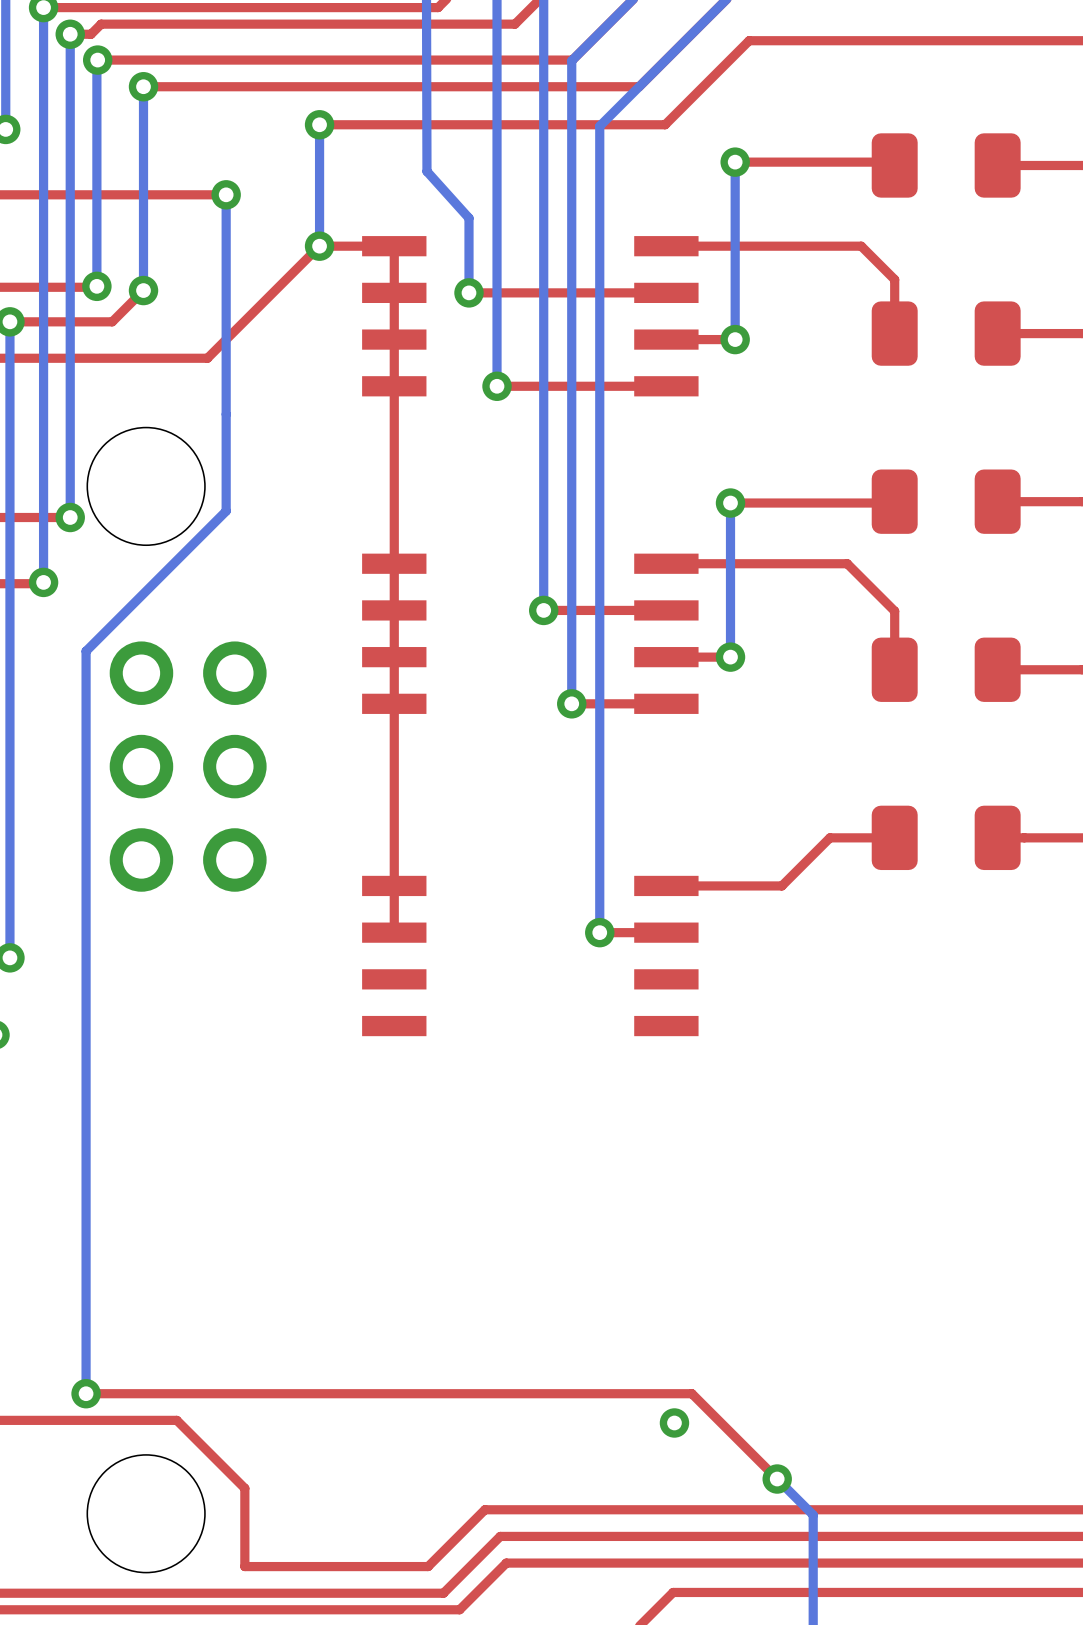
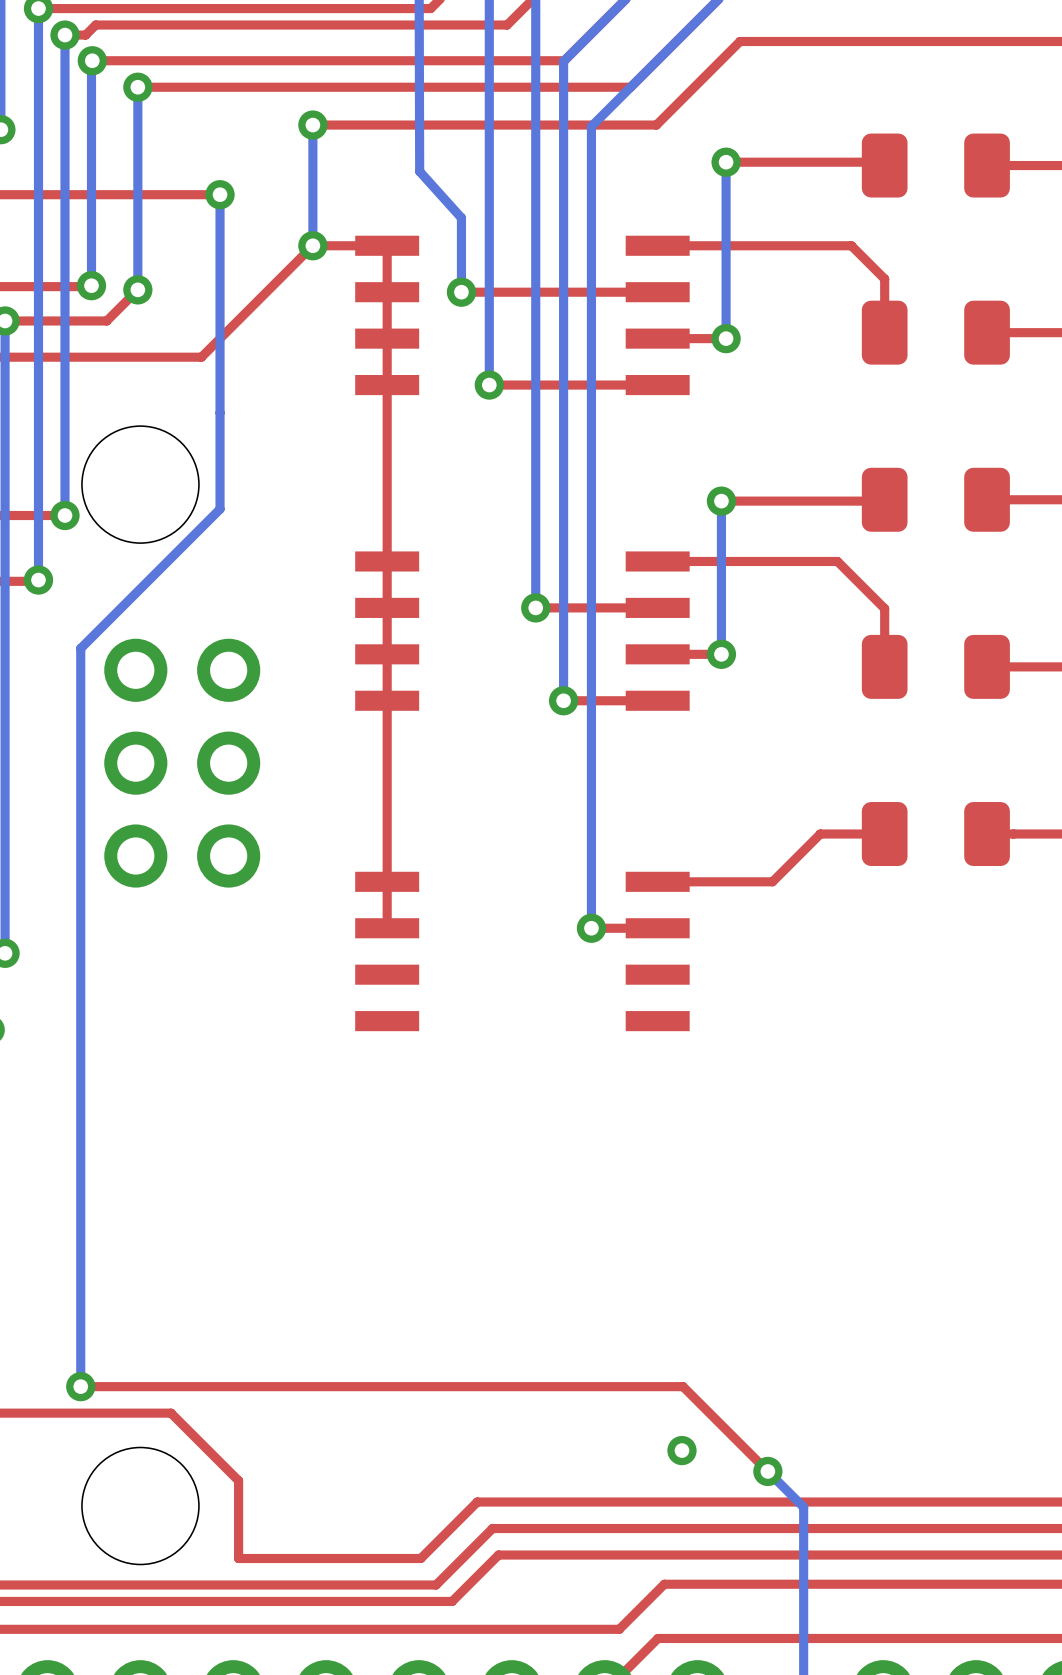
via position: (674, 1422) -> (681, 1450)

